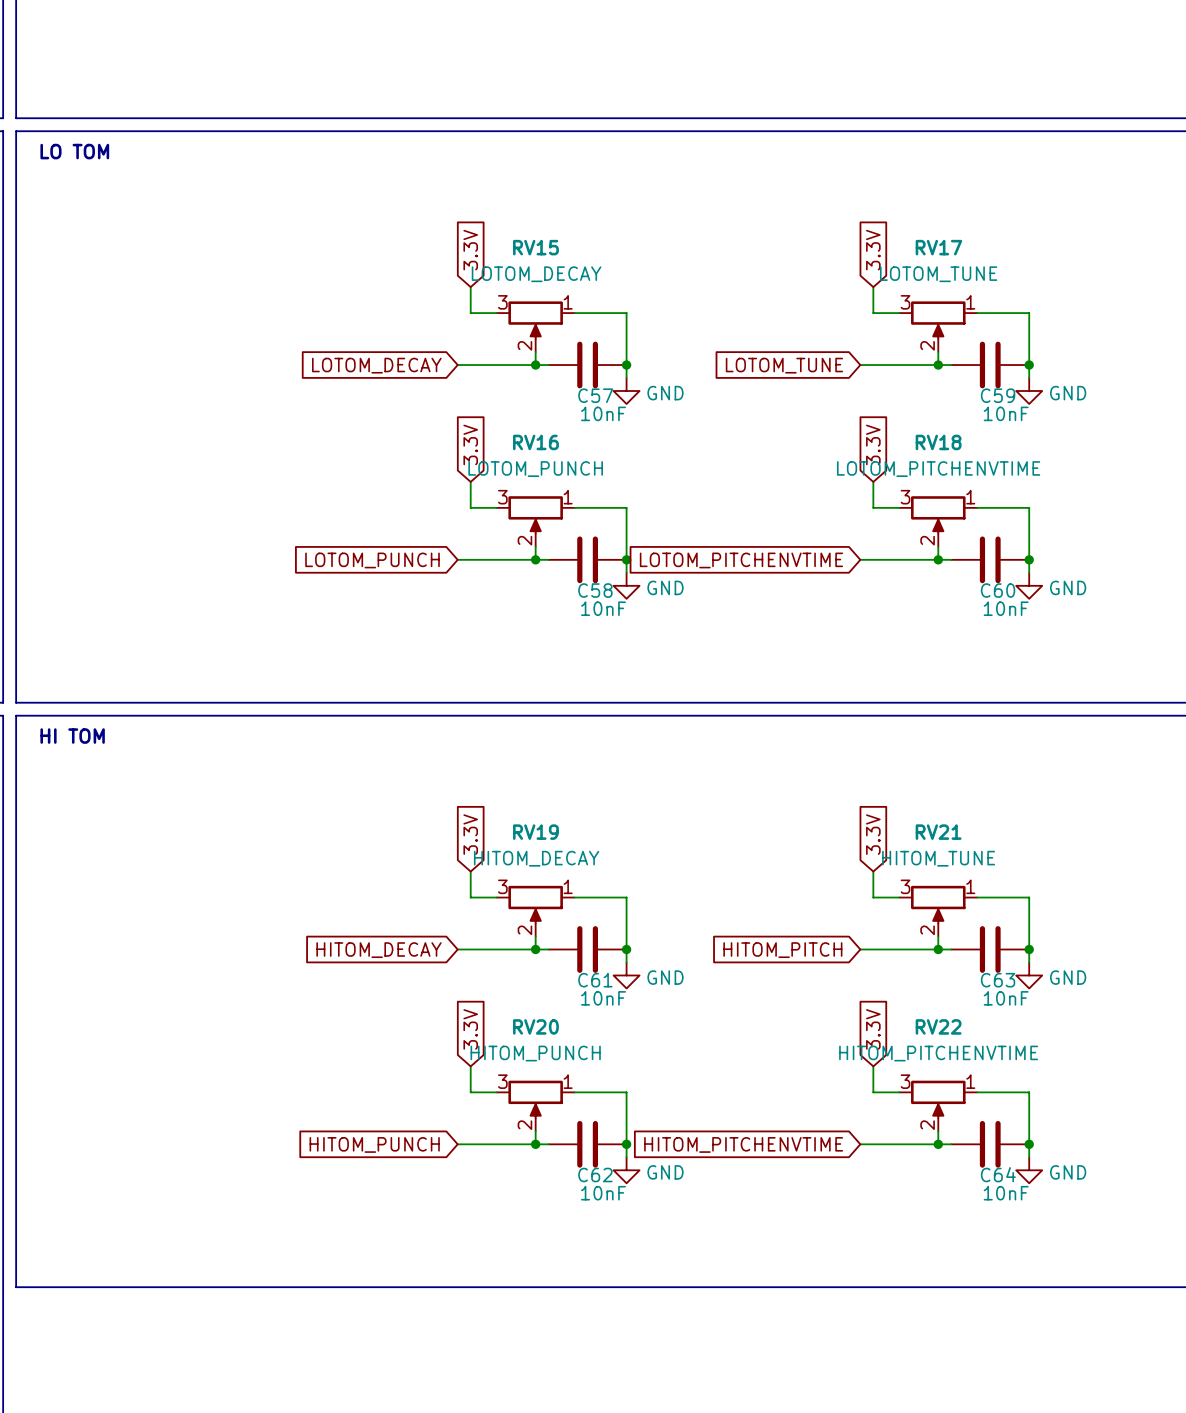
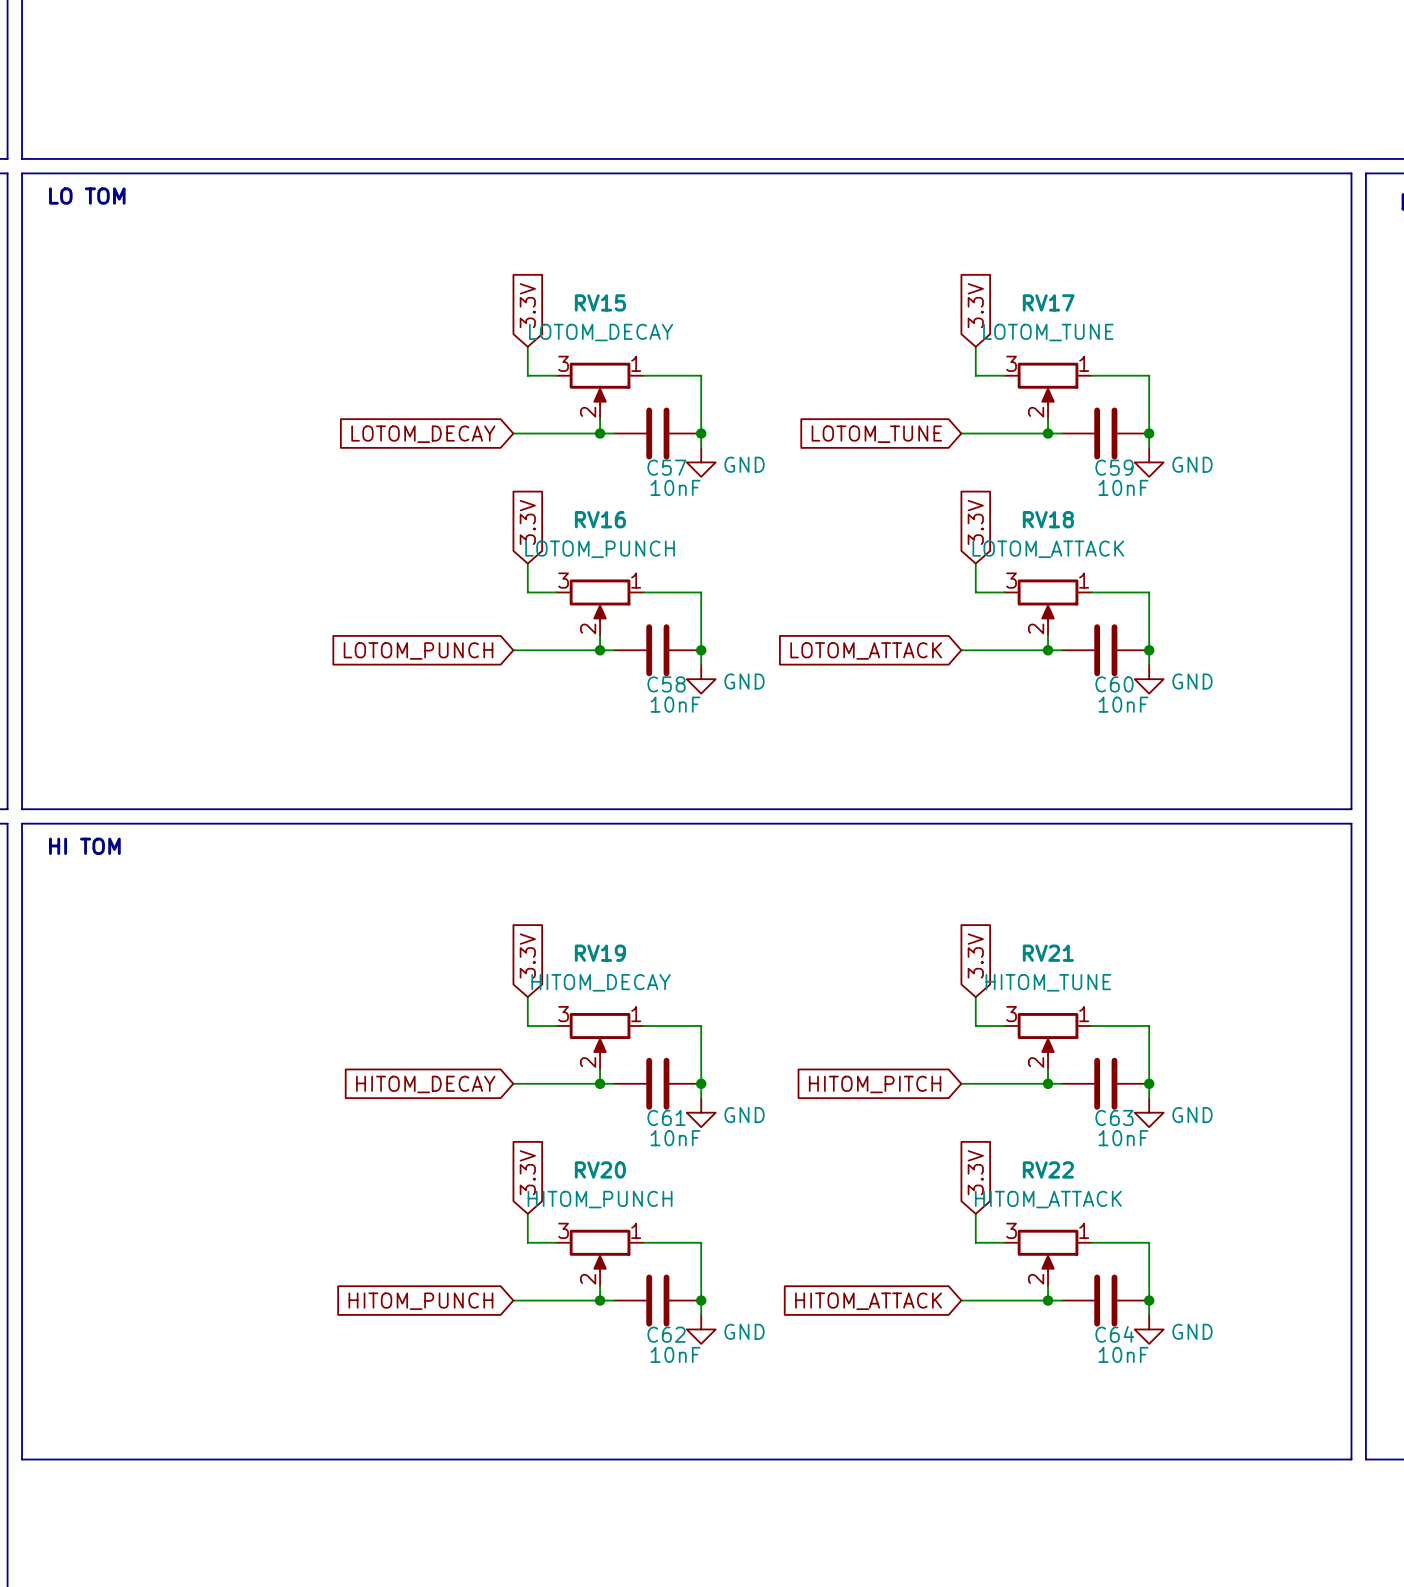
RV18 value: LOTOM_PITCHENVTIME (938, 469) -> LOTOM_ATTACK (1048, 549)
global label: LOTOM_PITCHENVTIME (741, 560) -> LOTOM_ATTACK (866, 650)
RV22 value: HITOM_PITCHENVTIME (938, 1053) -> HITOM_ATTACK (1048, 1199)
global label: HITOM_PITCHENVTIME (743, 1144) -> HITOM_ATTACK (868, 1301)

